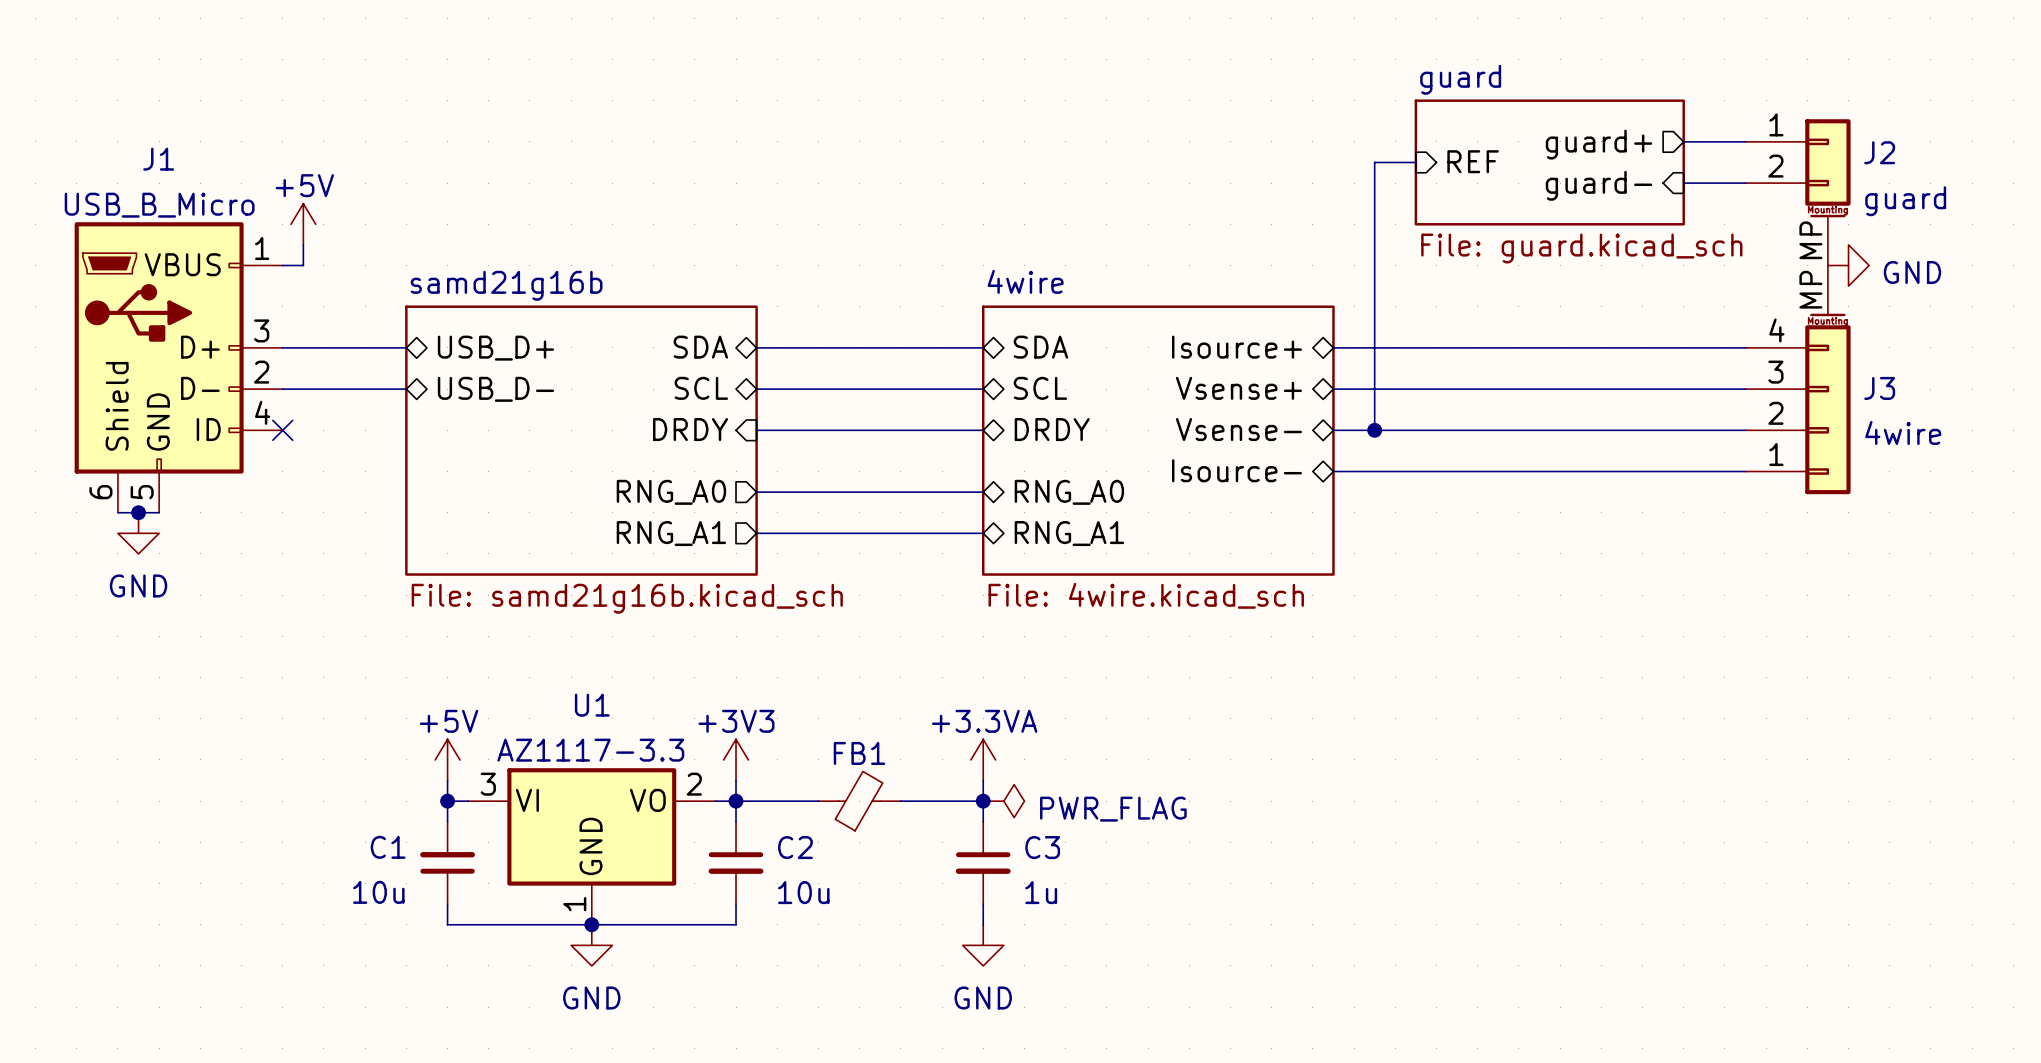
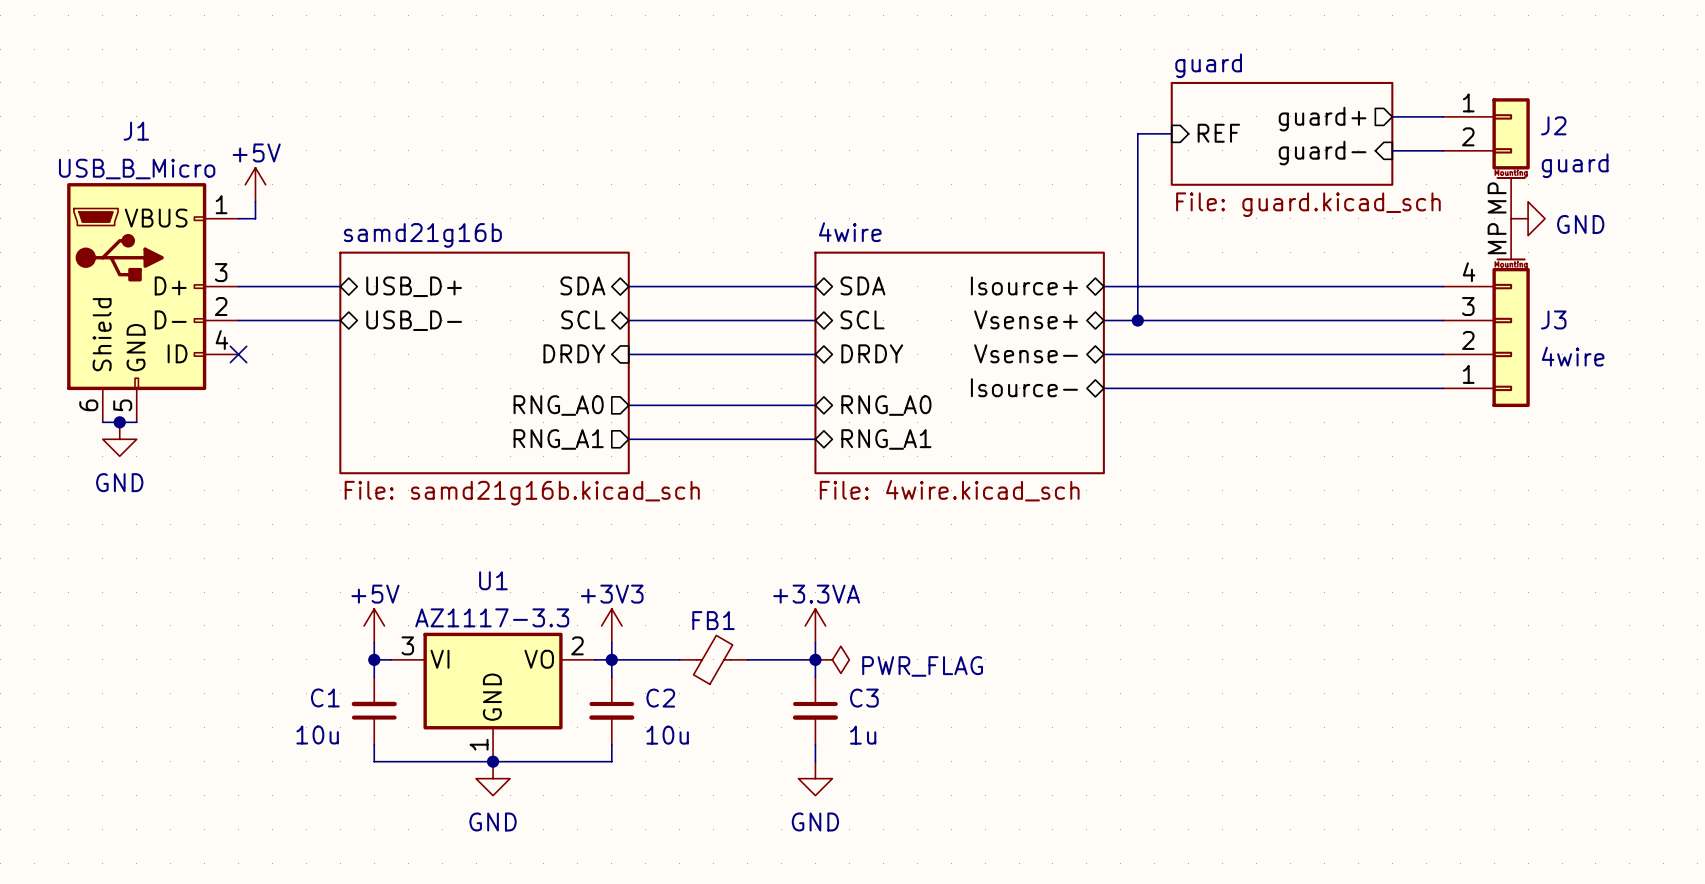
wire: (1374, 389) (1374, 430) -> none
junction position: (1374, 430) -> (1137, 320)

